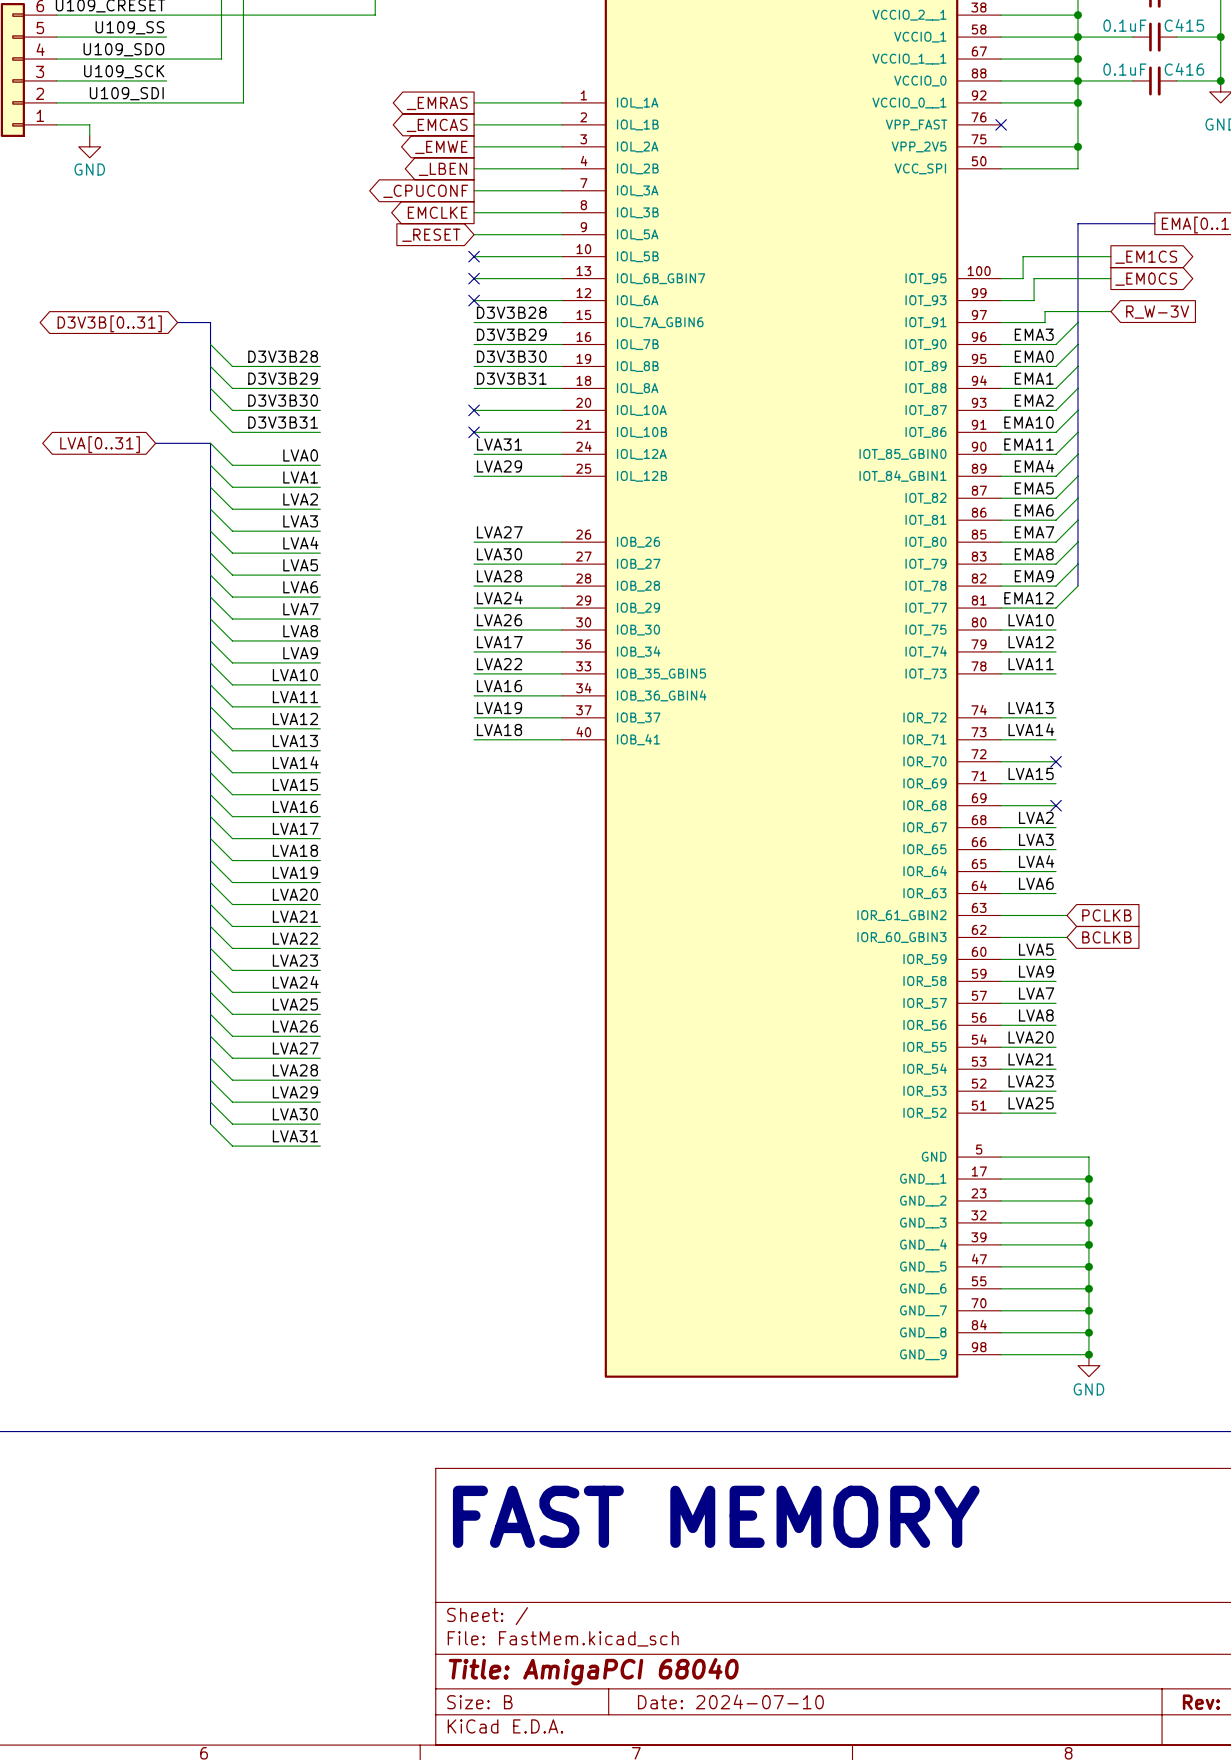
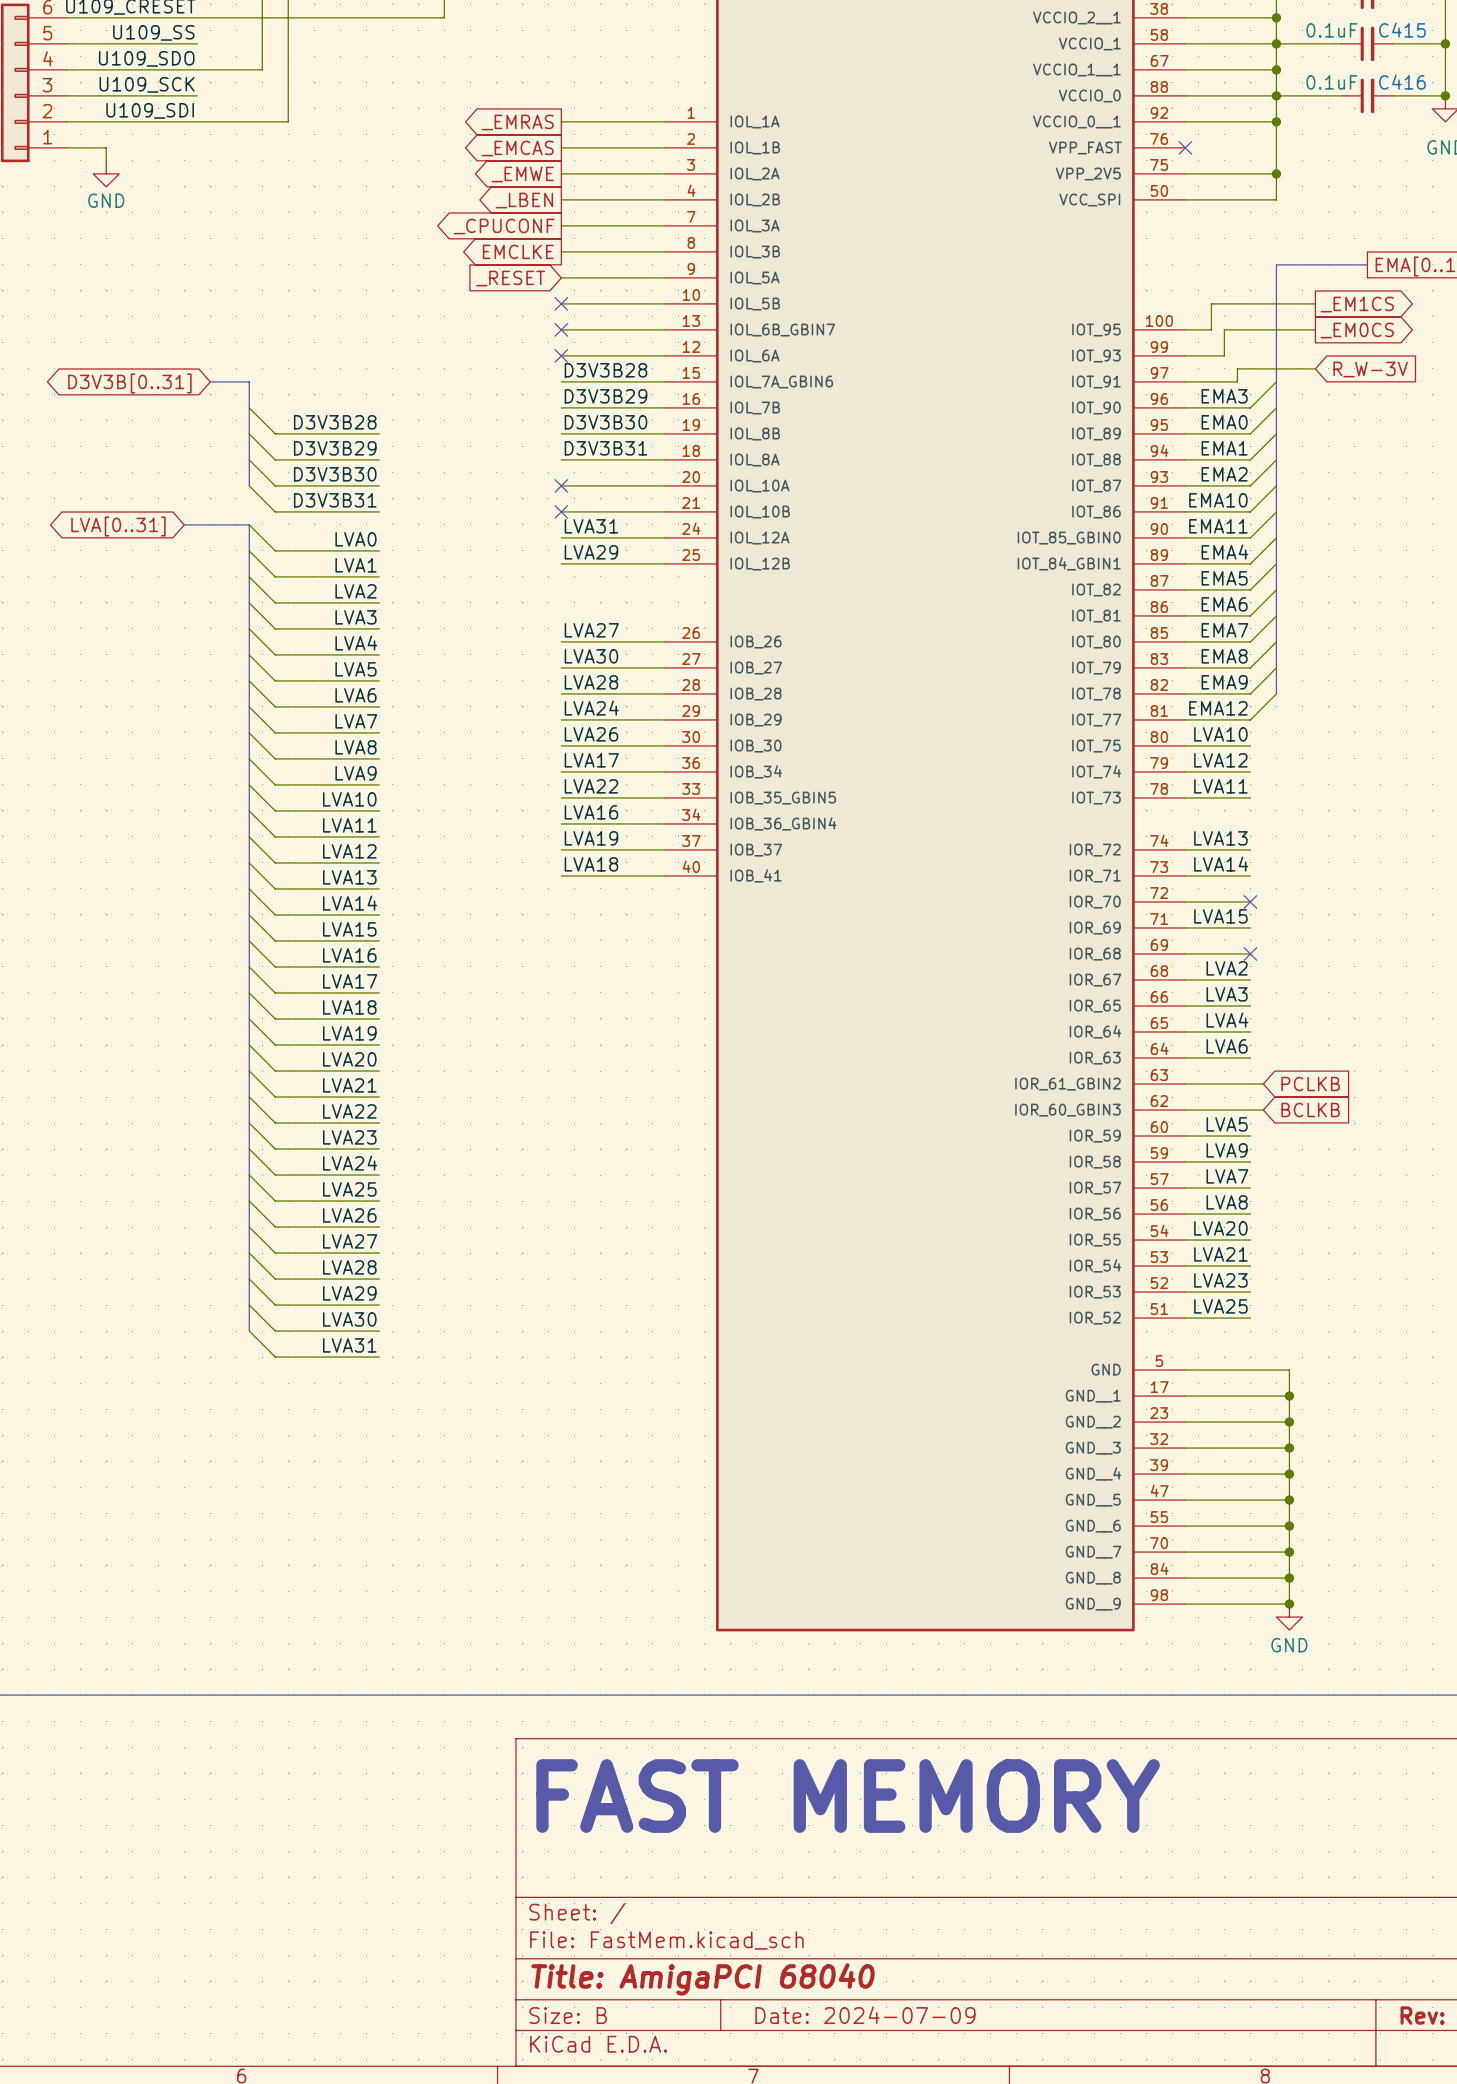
title block: Date: 2024-07-10 (730, 1701) -> Date: 2024-07-09 (865, 2015)

